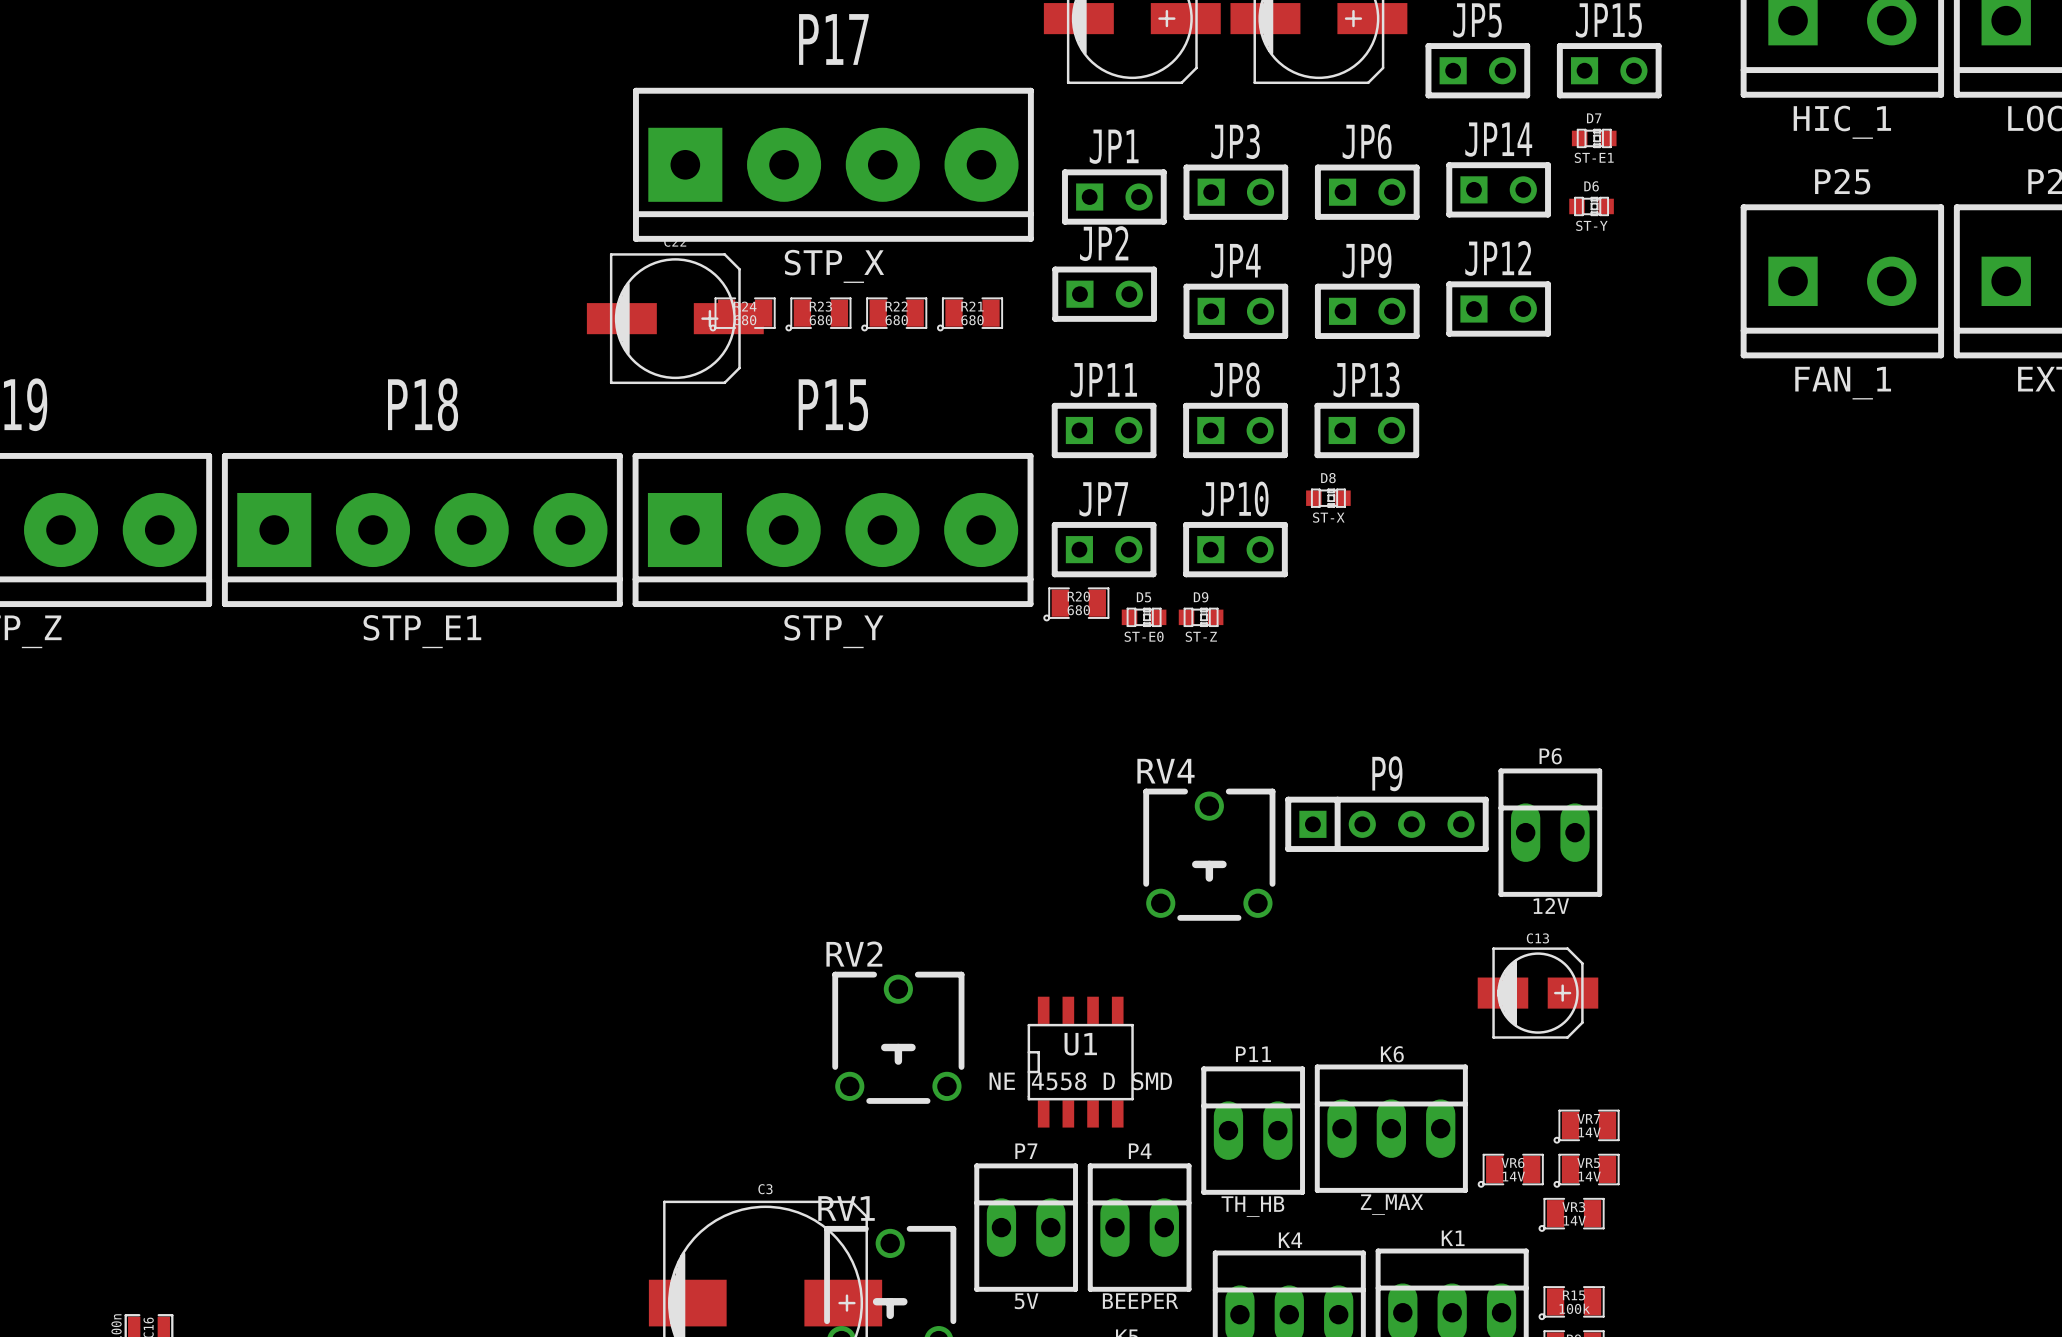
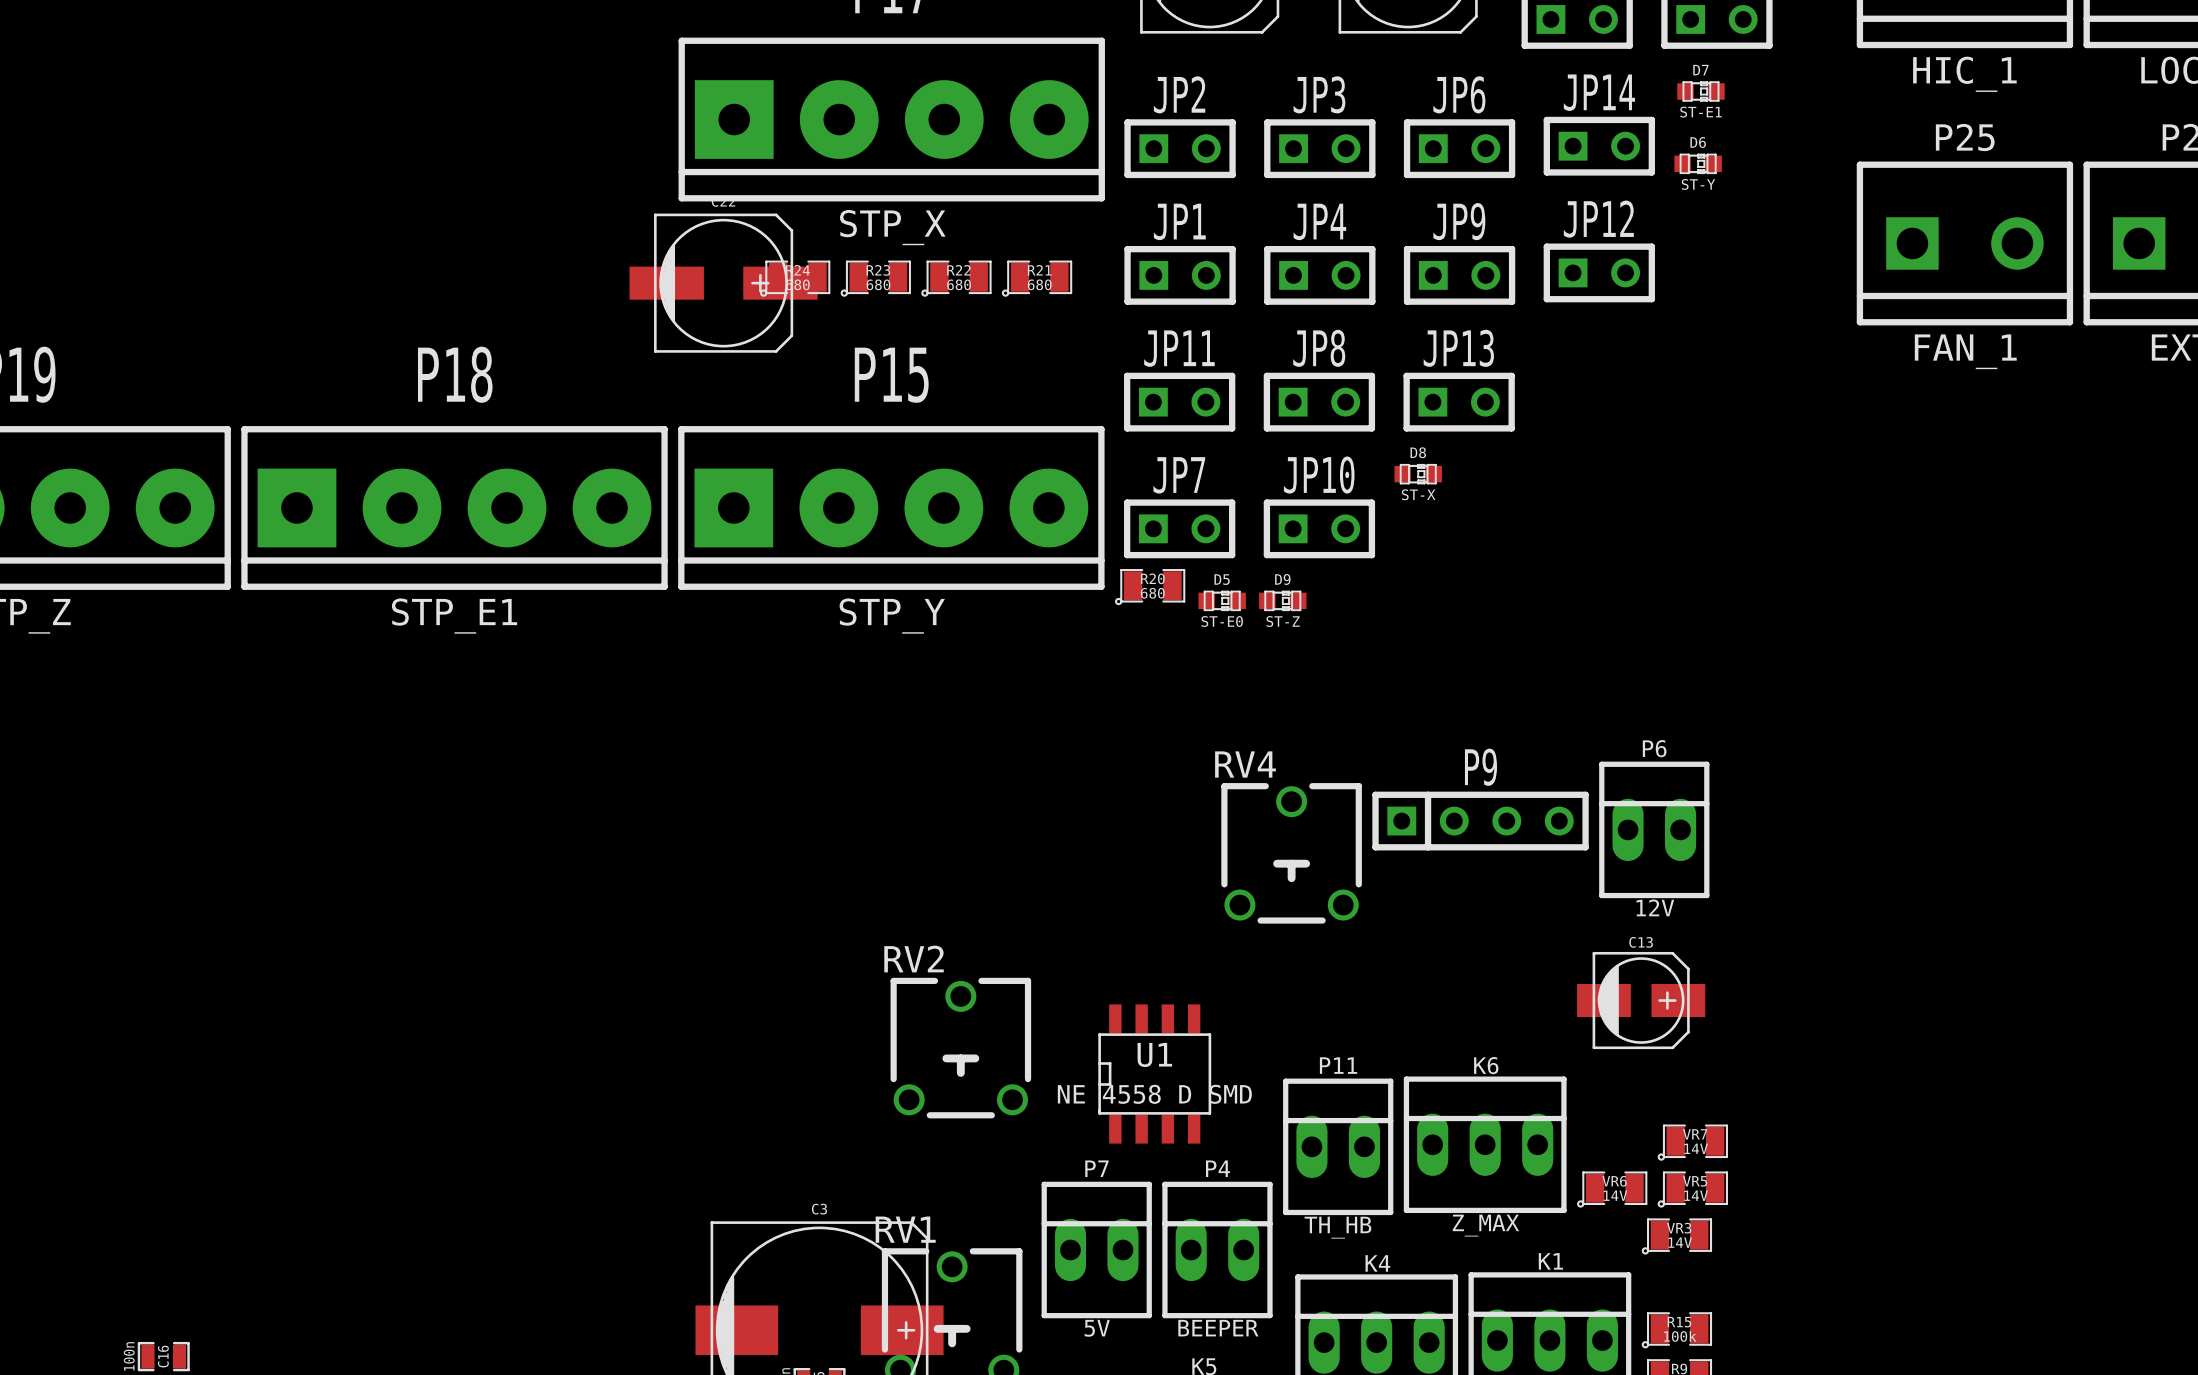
JP1 position: (1114, 197) -> (1180, 275)
JP2 position: (1104, 294) -> (1180, 148)

